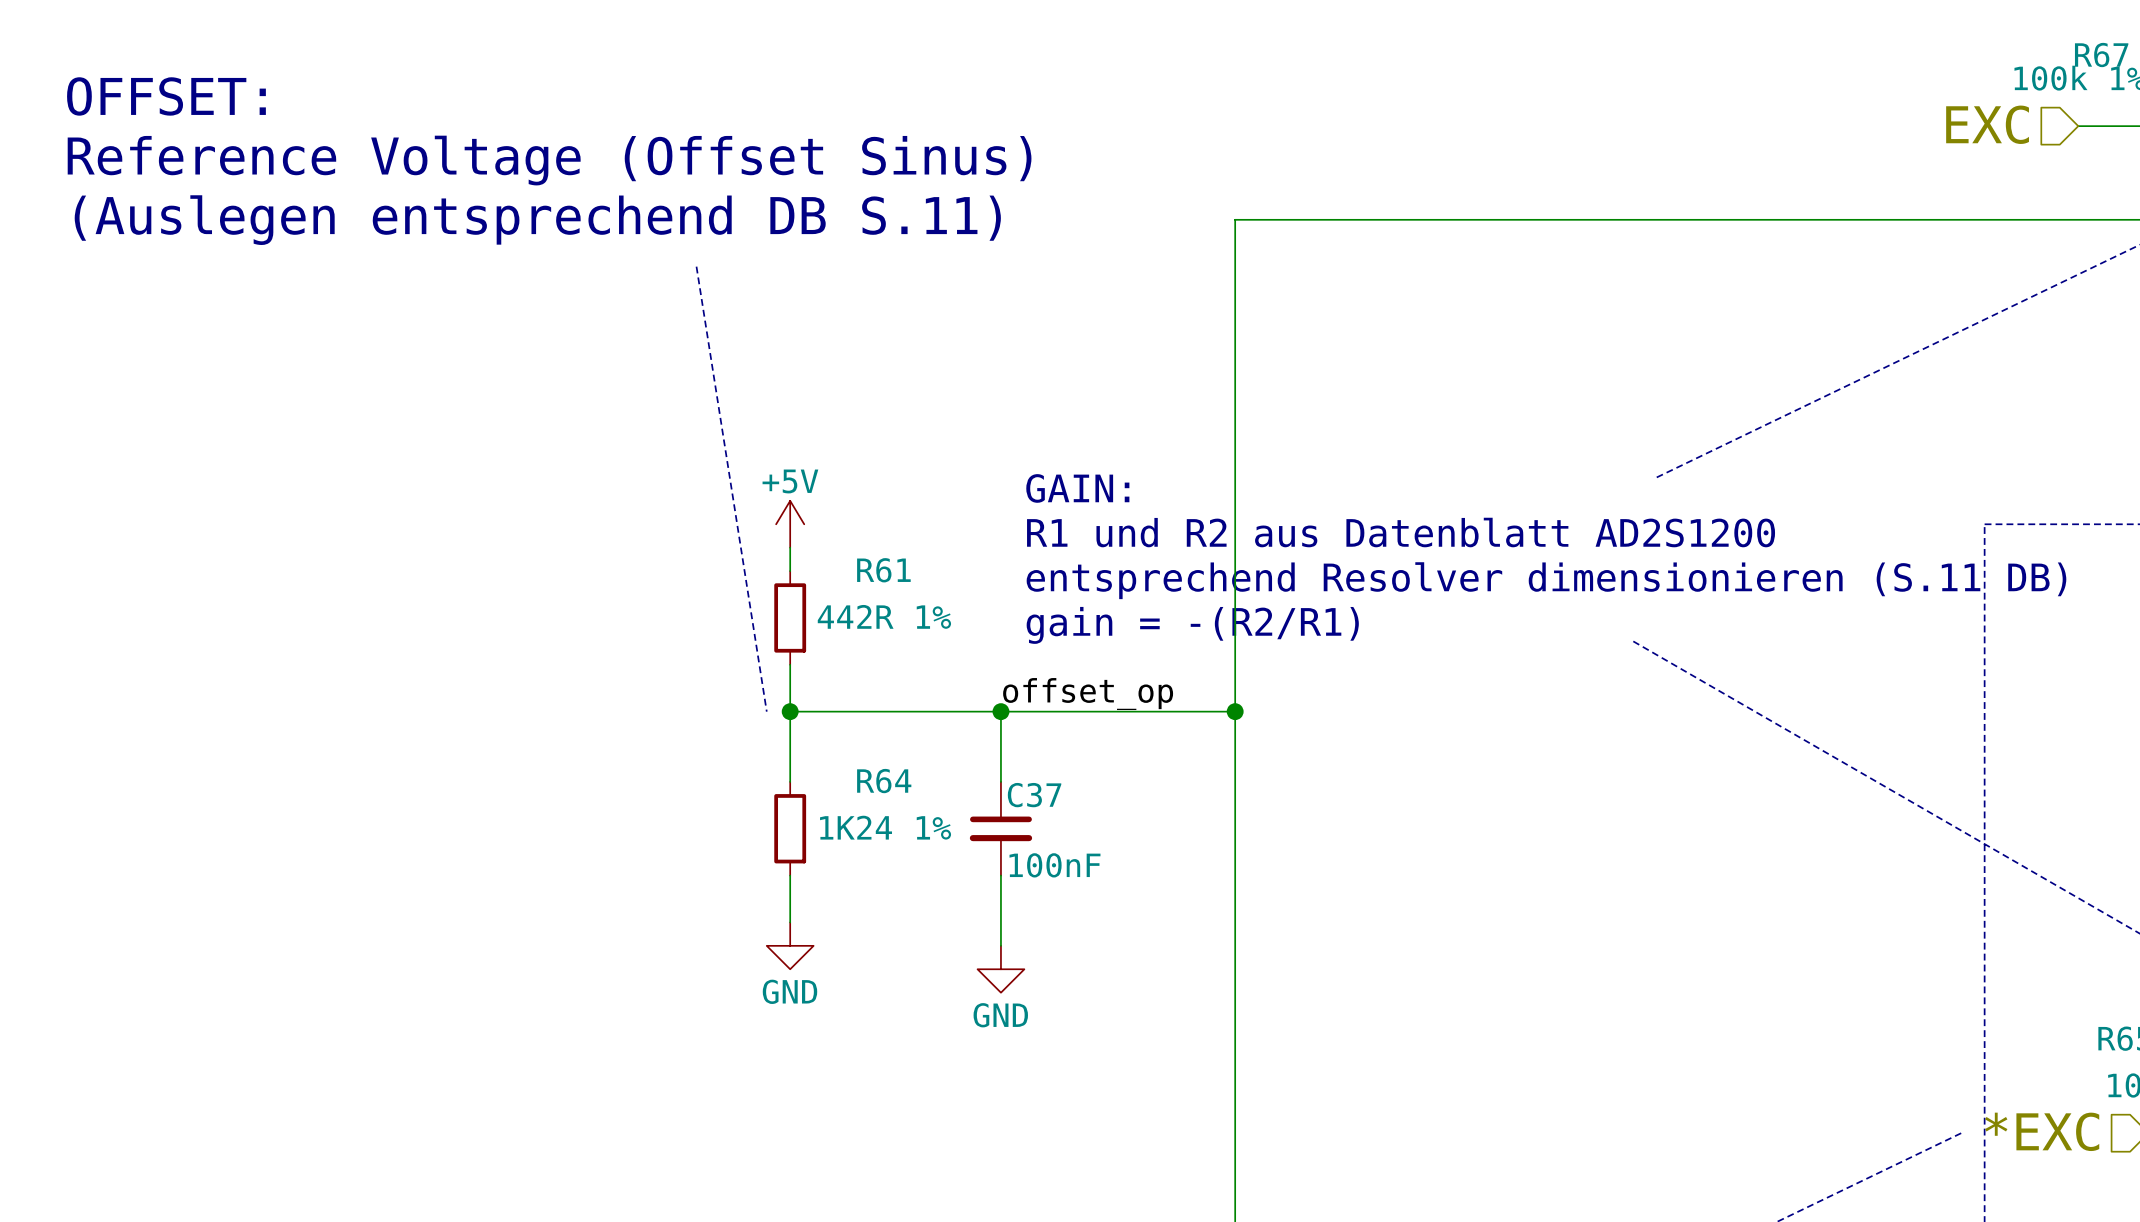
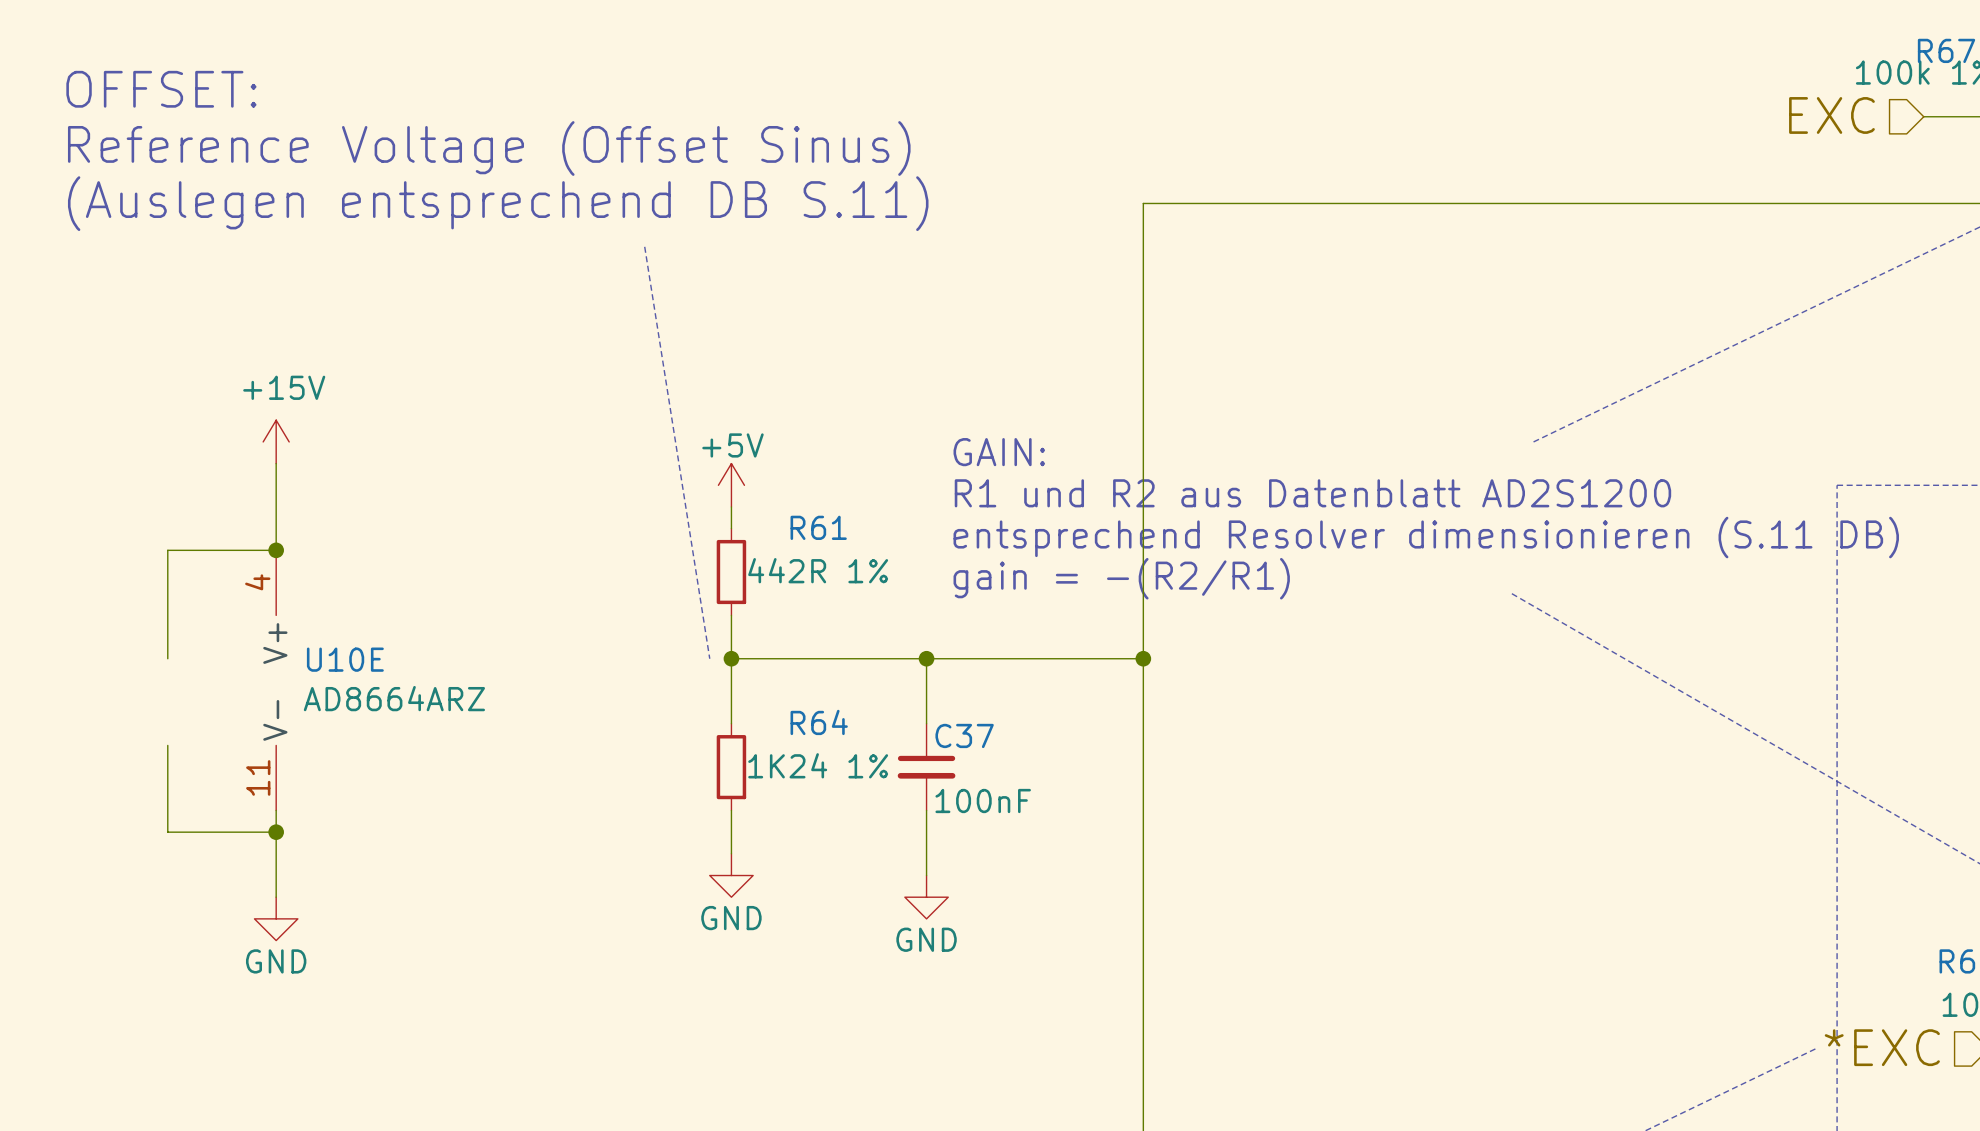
power symbol: none -> +15V (276, 441)
wire: none -> (276, 463) (276, 550) (167, 550) (167, 658)
junction: none -> (276, 550)
label: offset_op (1088, 694) -> none
U10E: none -> AD8664ARZ (276, 680)
wire: none -> (167, 745) (167, 832) (276, 832)
wire: none -> (276, 810) (276, 897)
junction: none -> (276, 832)
power symbol: none -> GND (276, 918)

